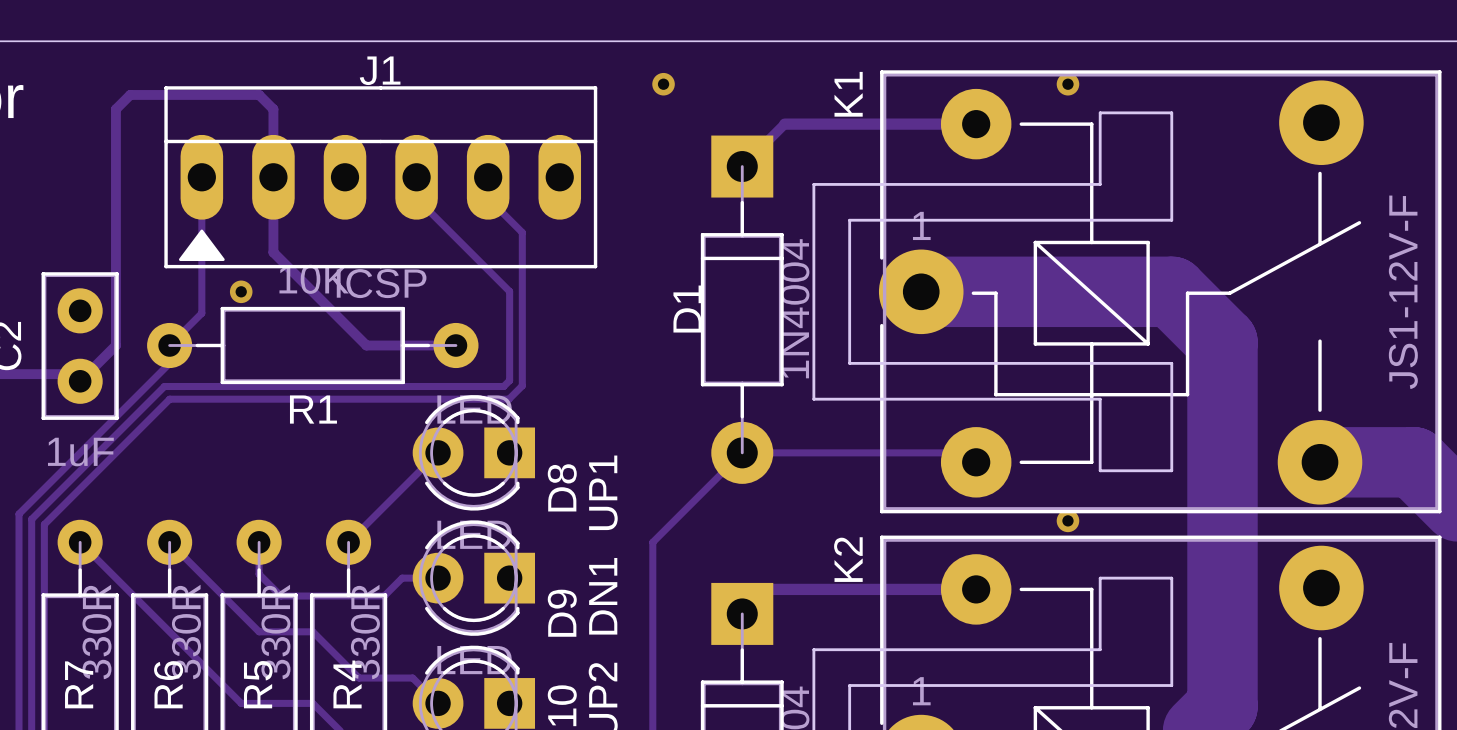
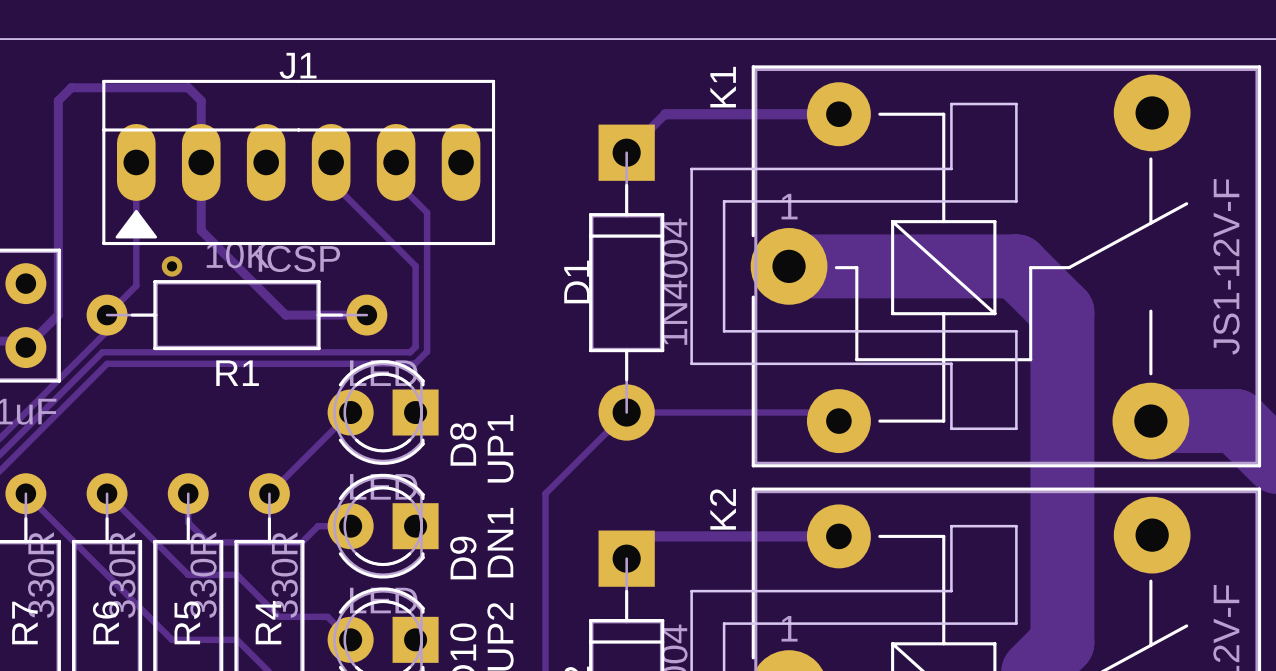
via: (663, 84) -> none
via: (1067, 84) -> none
via: (1067, 520) -> none

